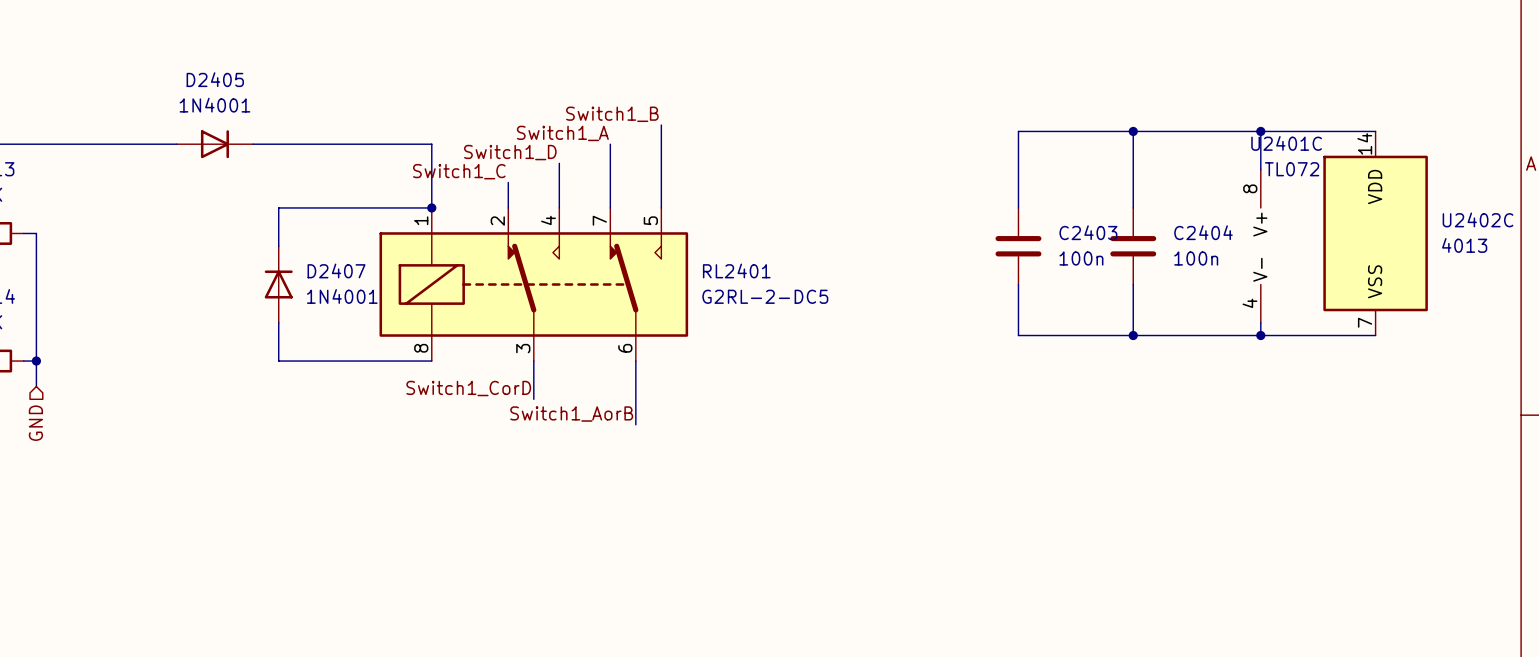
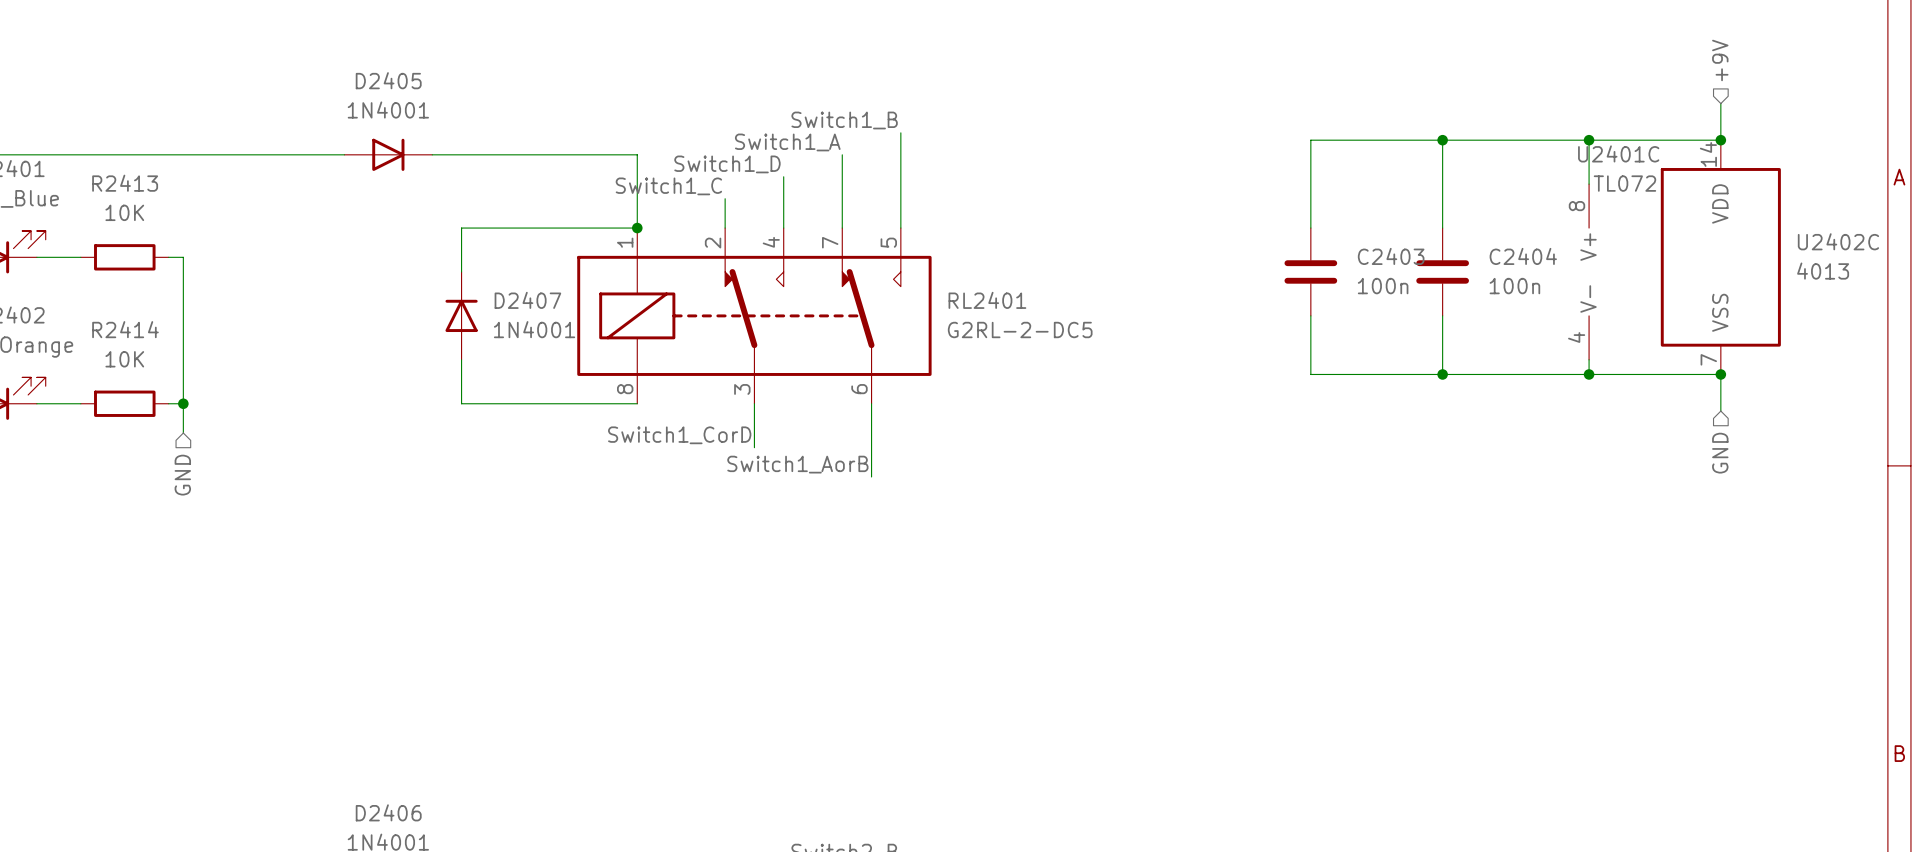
hierarchical label: none -> +9V (1720, 60)
wire: none -> (1720, 103) (1720, 140)
junction: none -> (1720, 140)
wire: none -> (1720, 374) (1720, 411)
junction: none -> (1720, 374)
hierarchical label: none -> GND (1720, 453)

